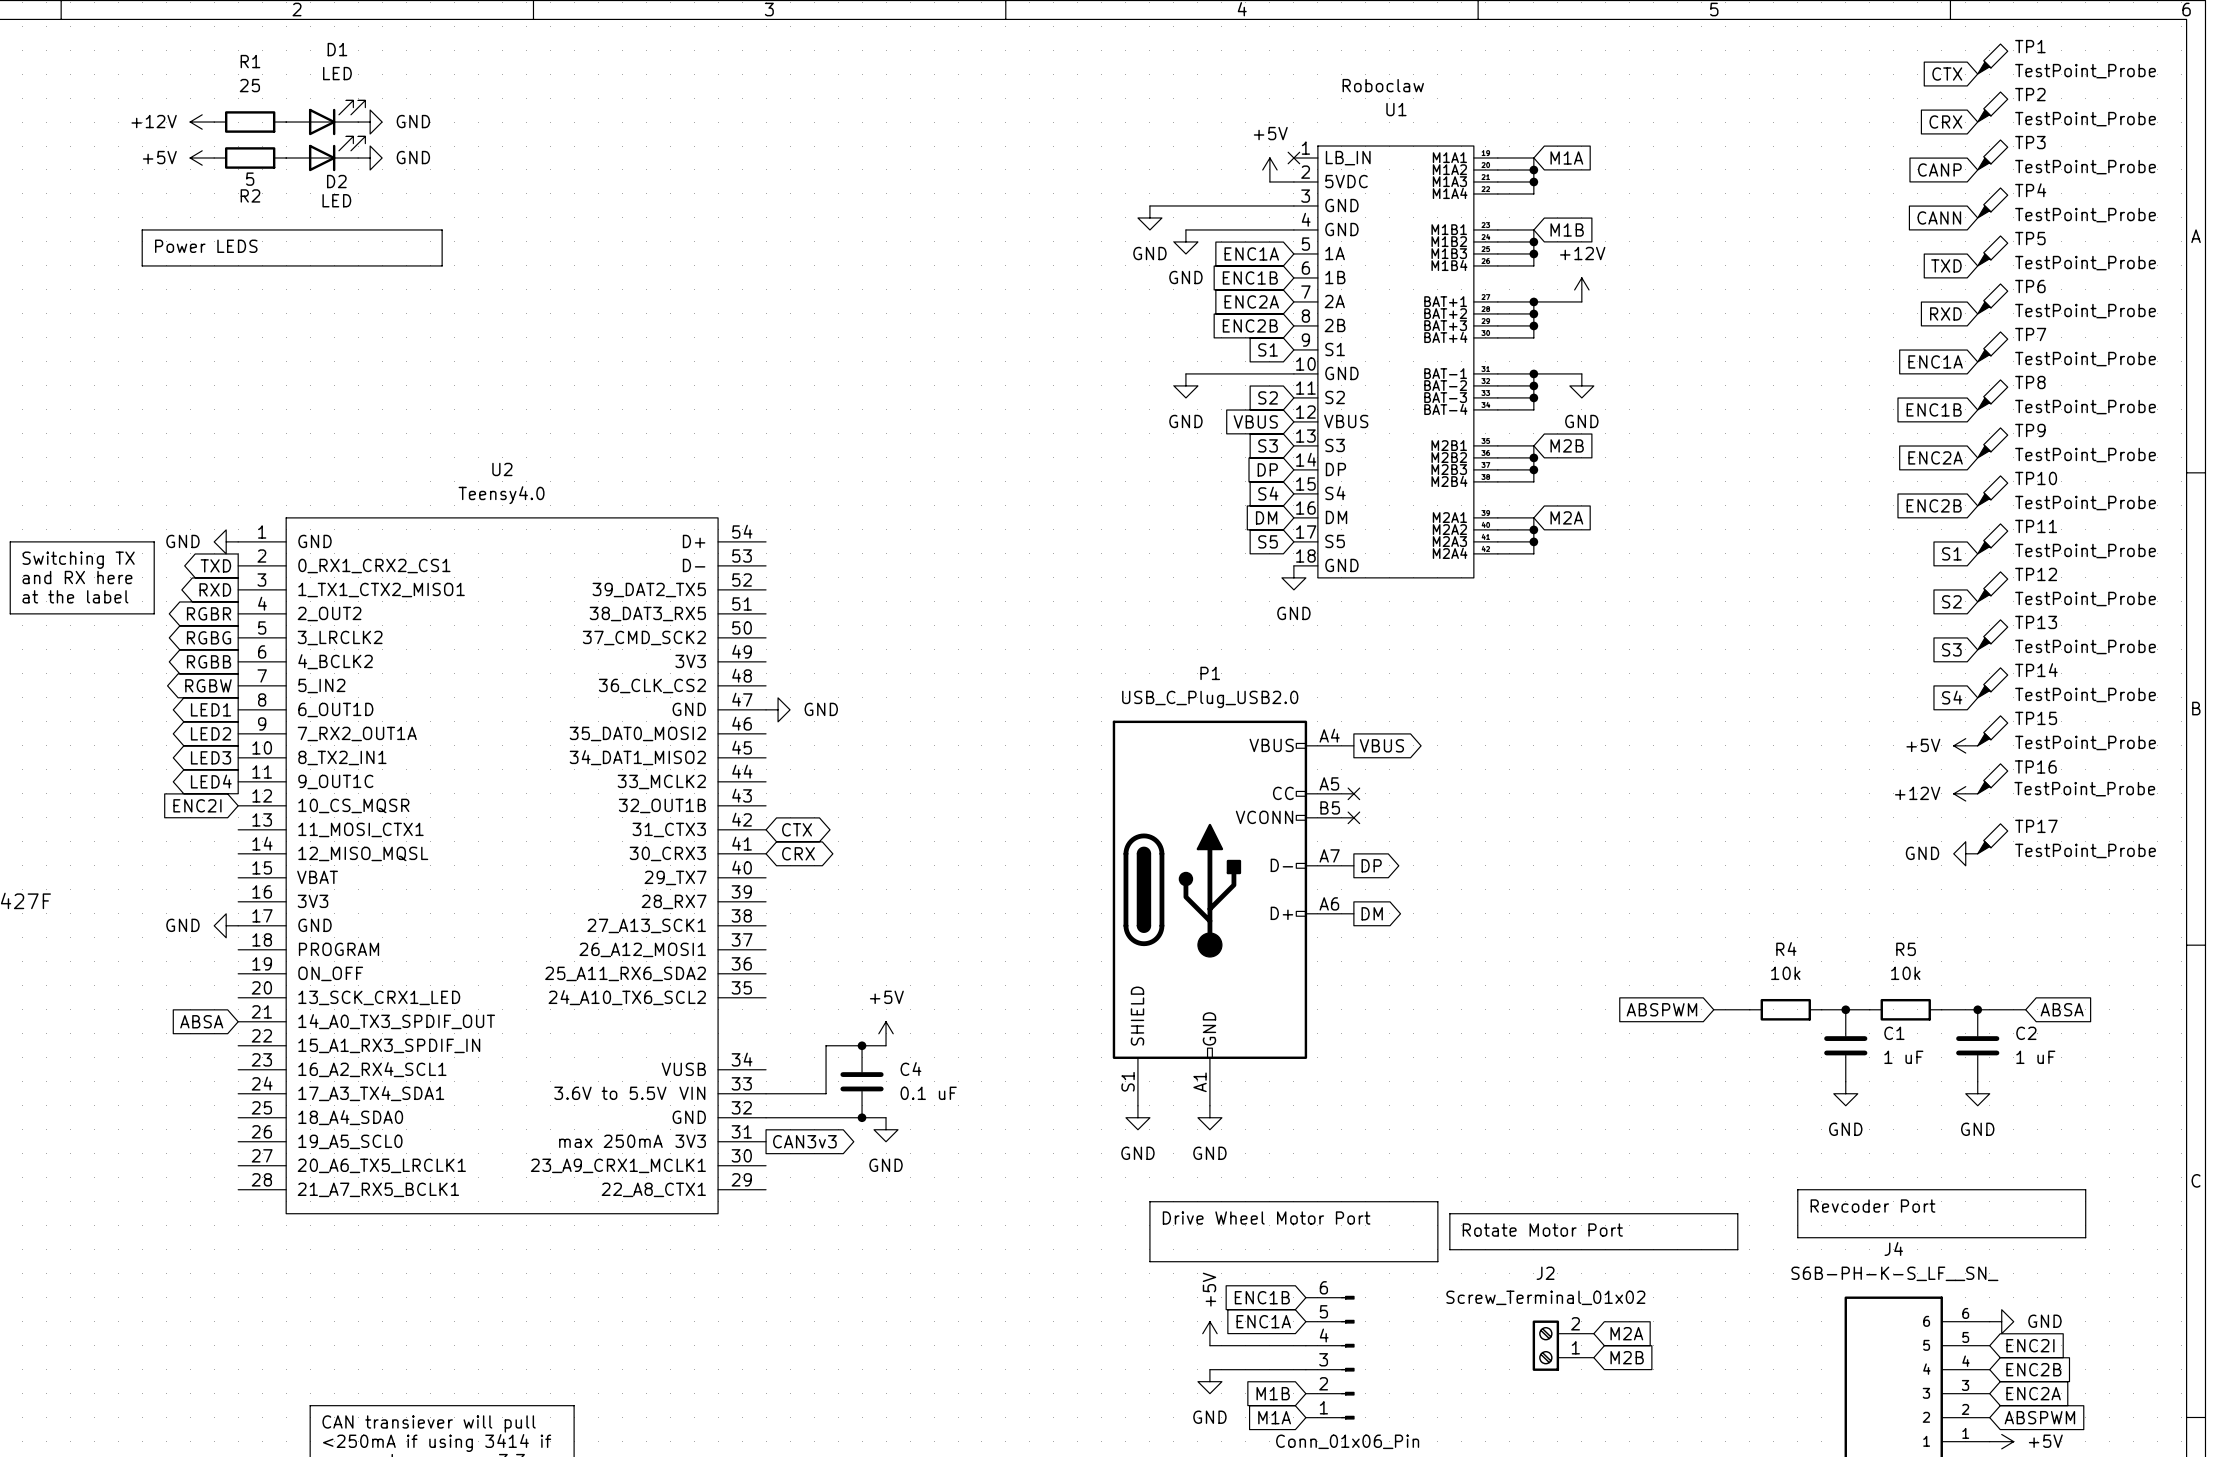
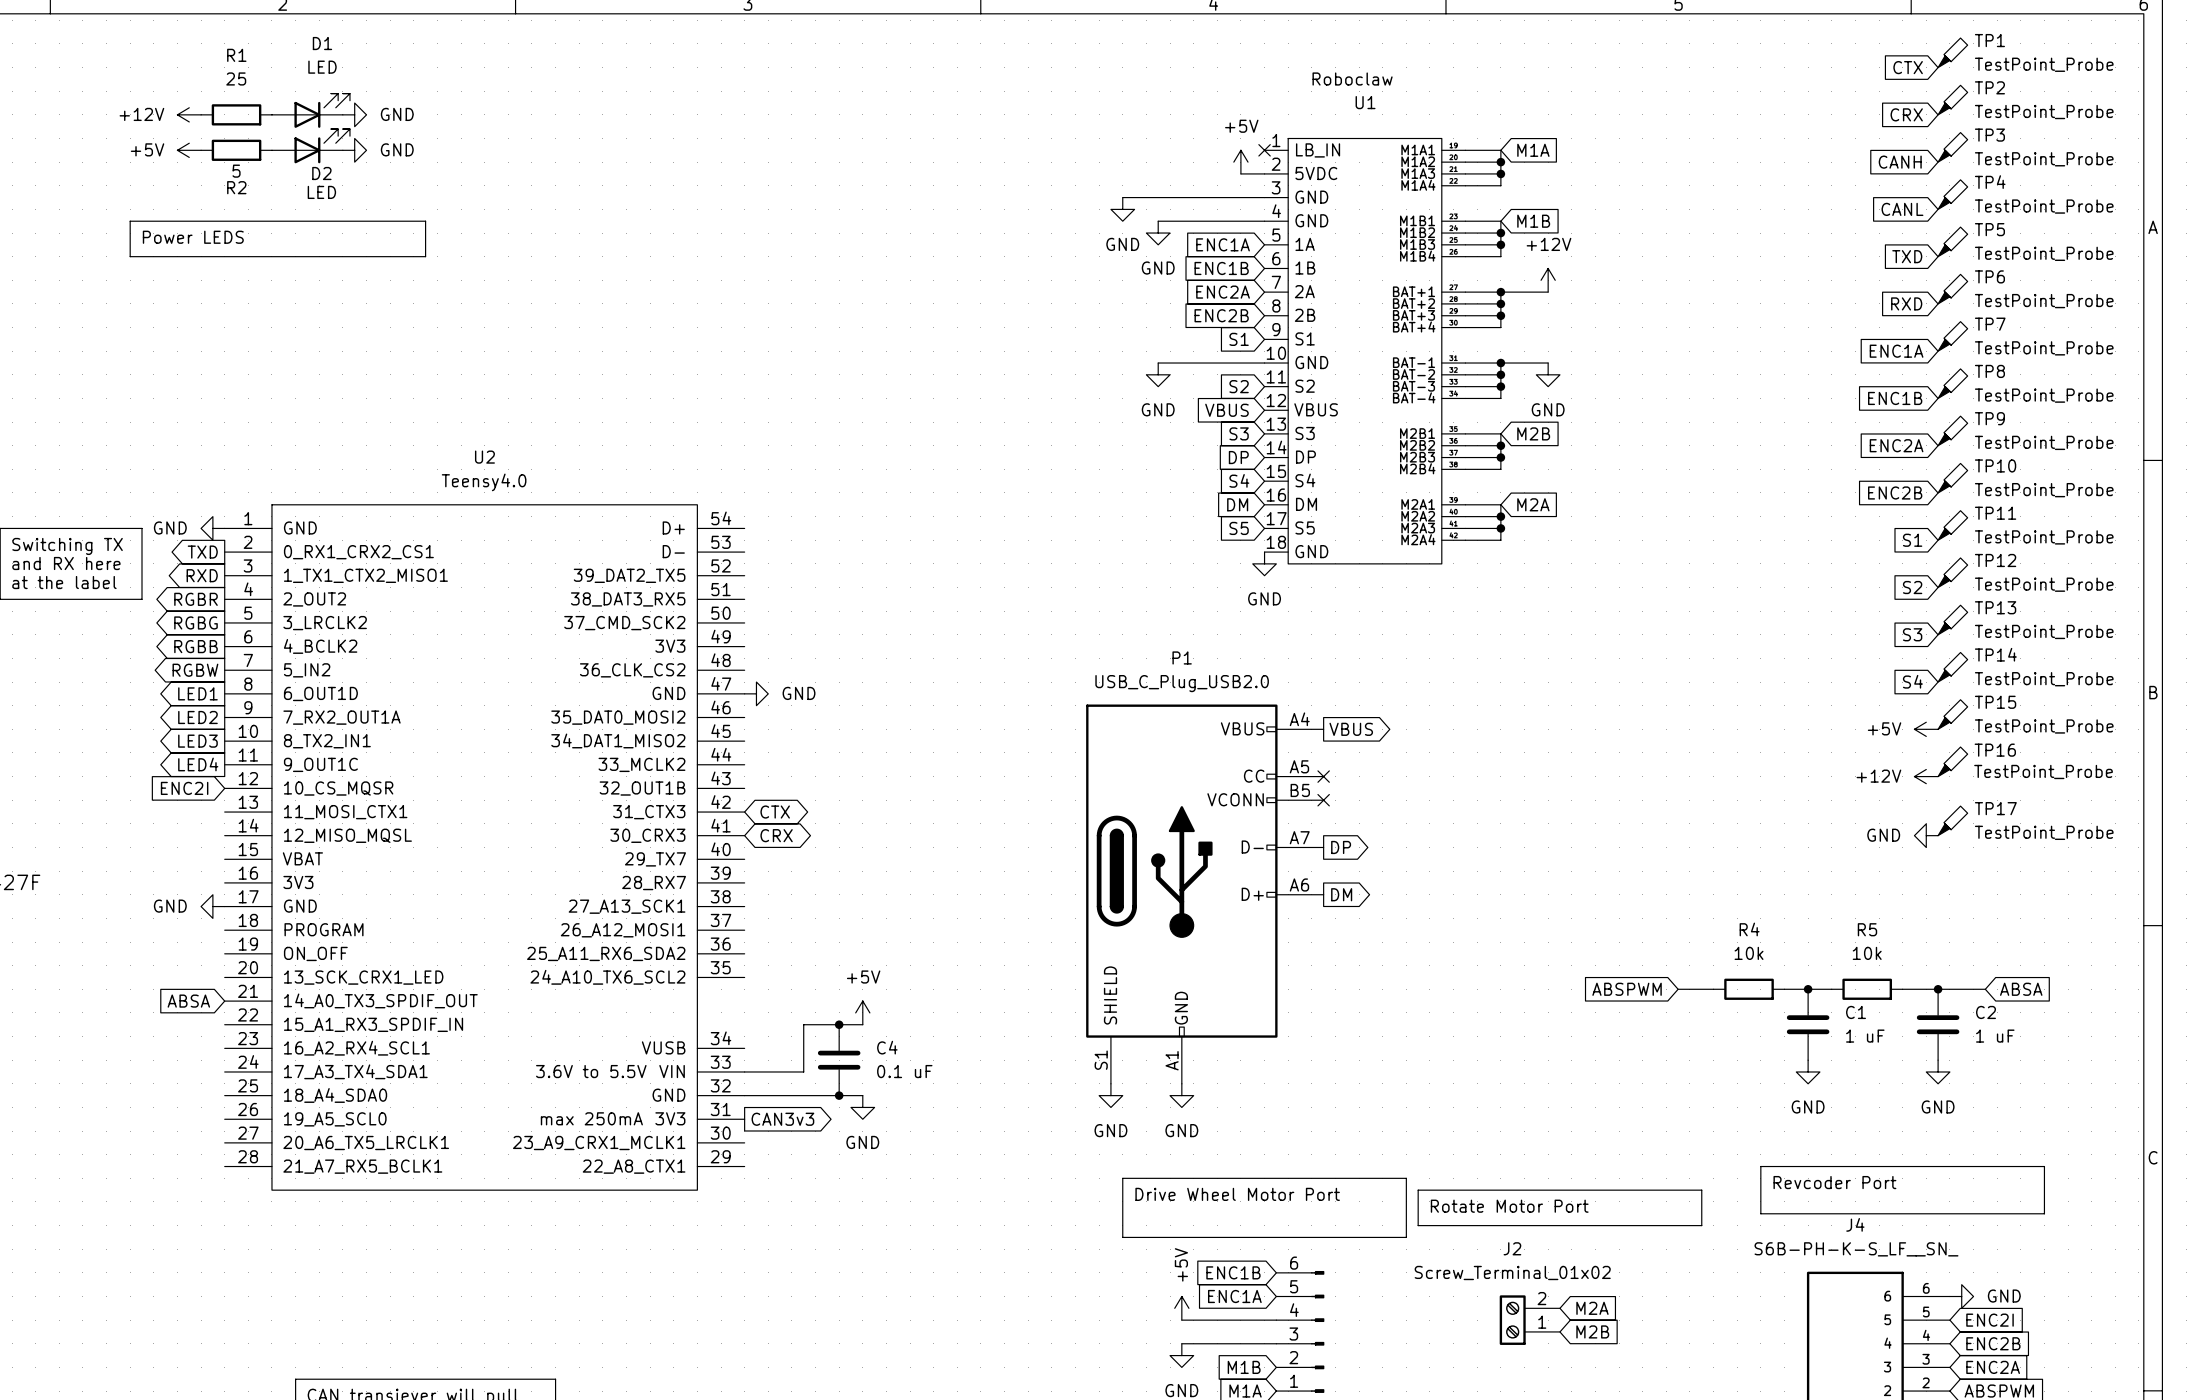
global label: CANP (1939, 169) -> CANH (1900, 162)
global label: CANN (1939, 217) -> CANL (1902, 209)

